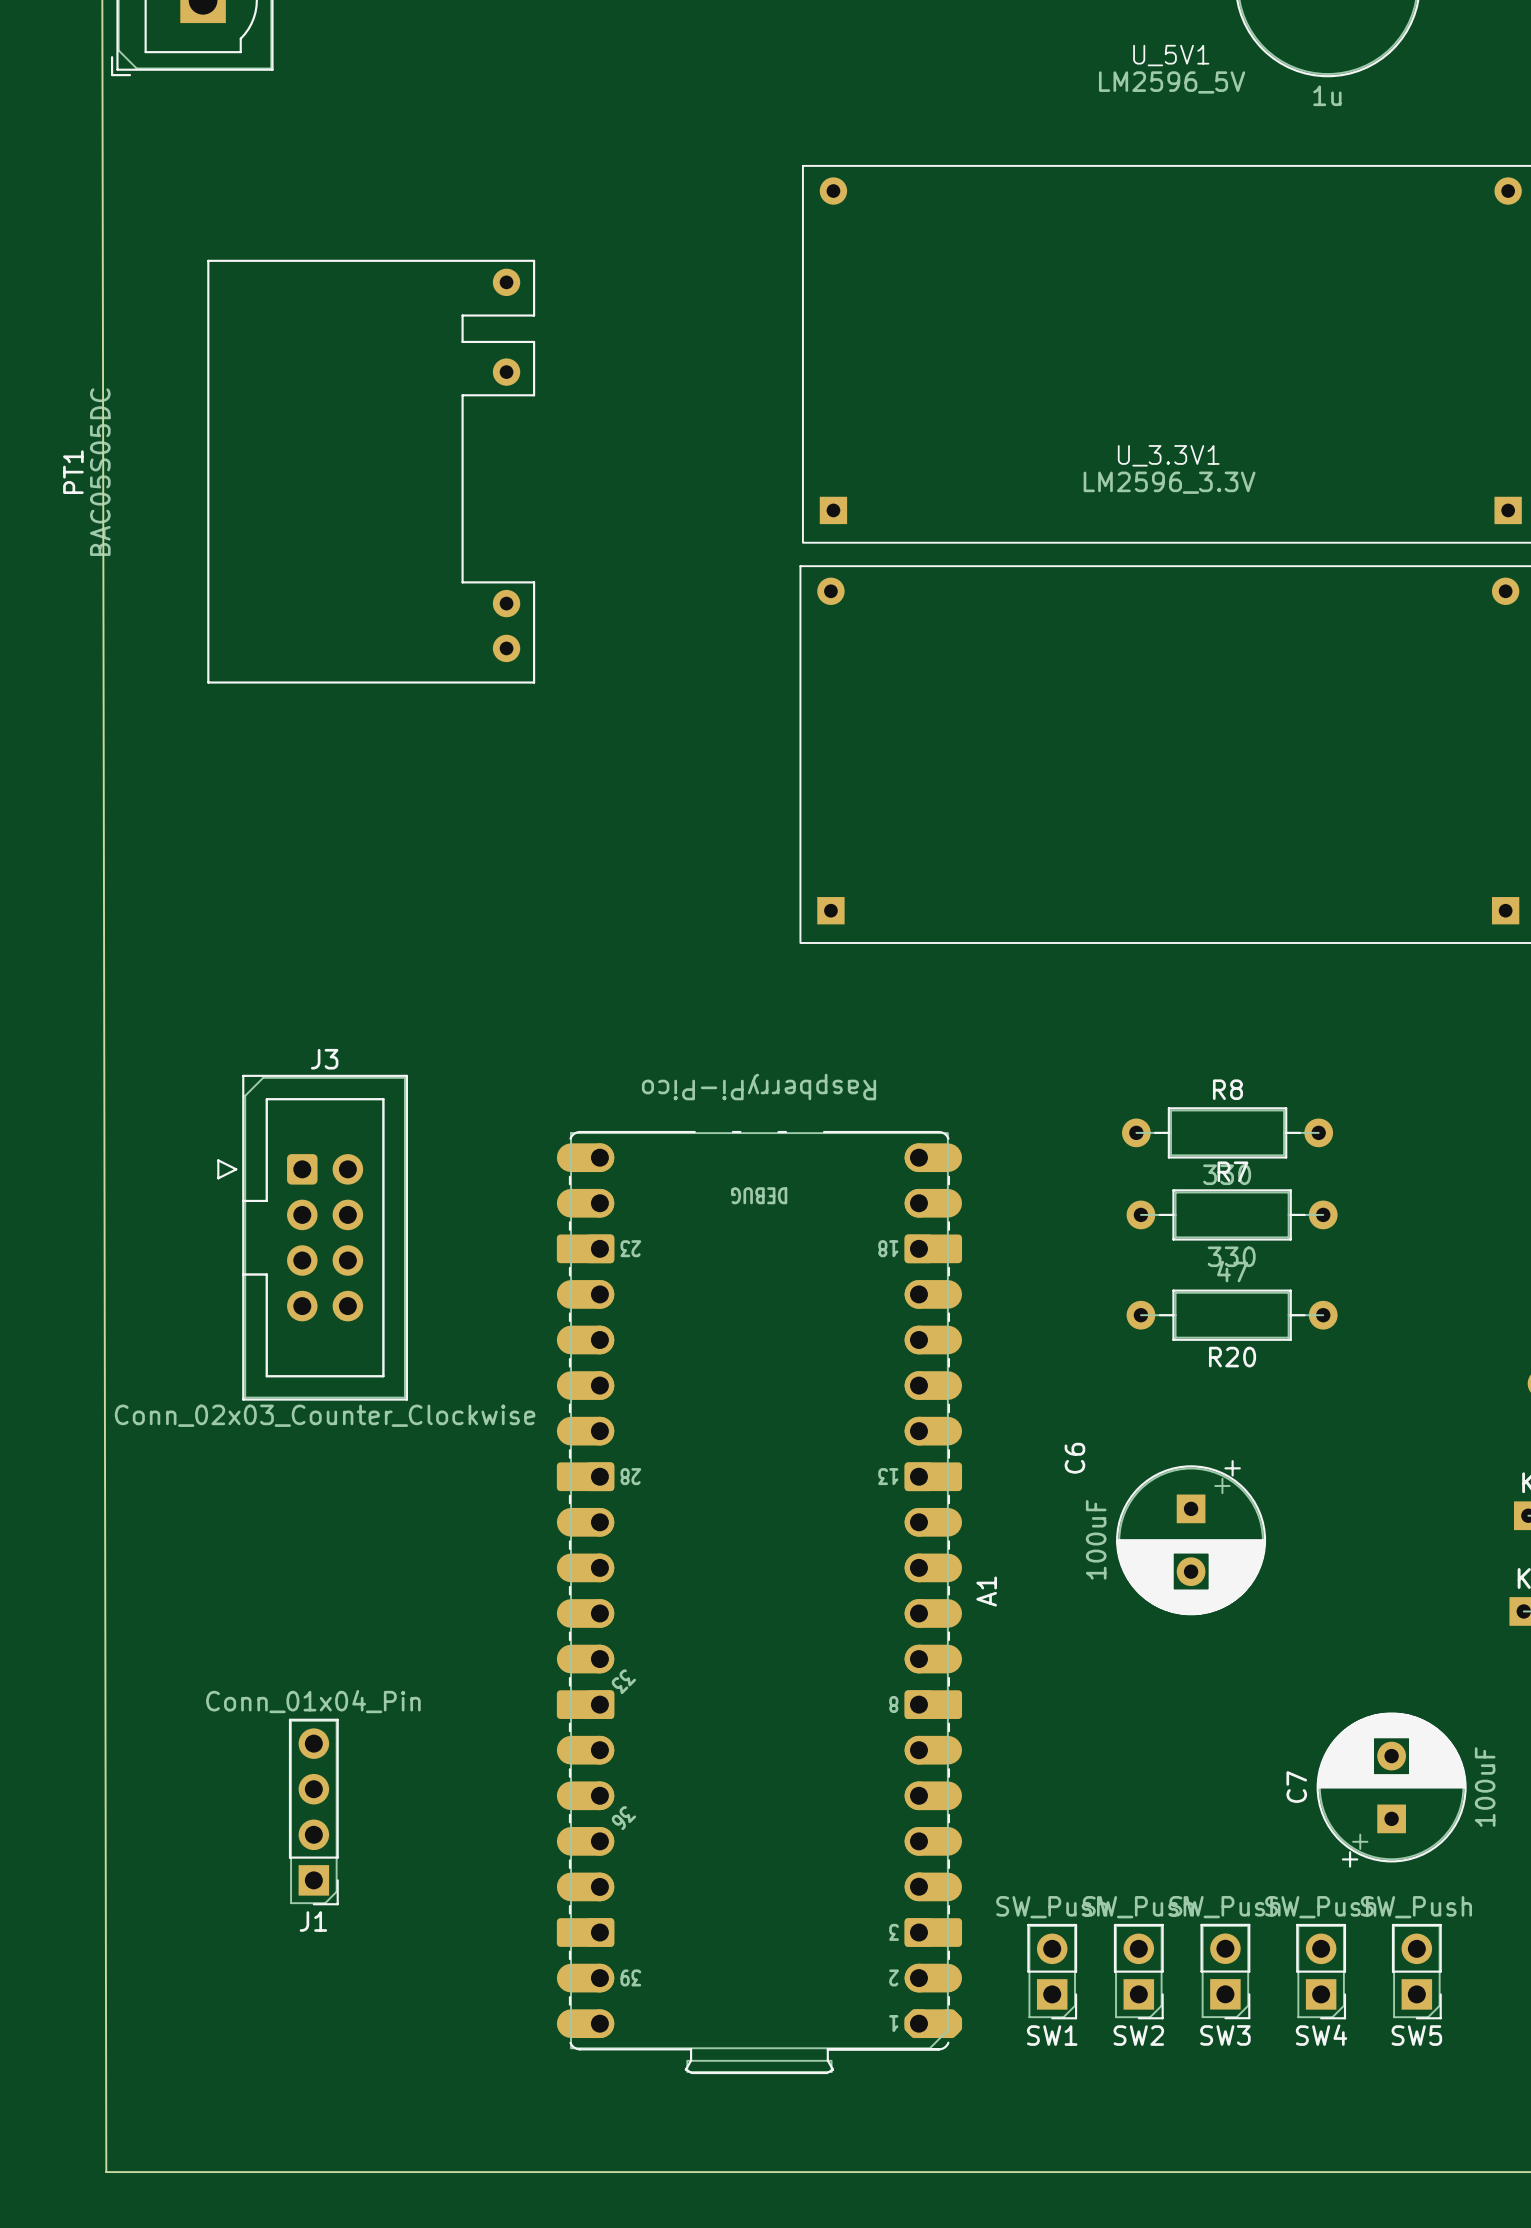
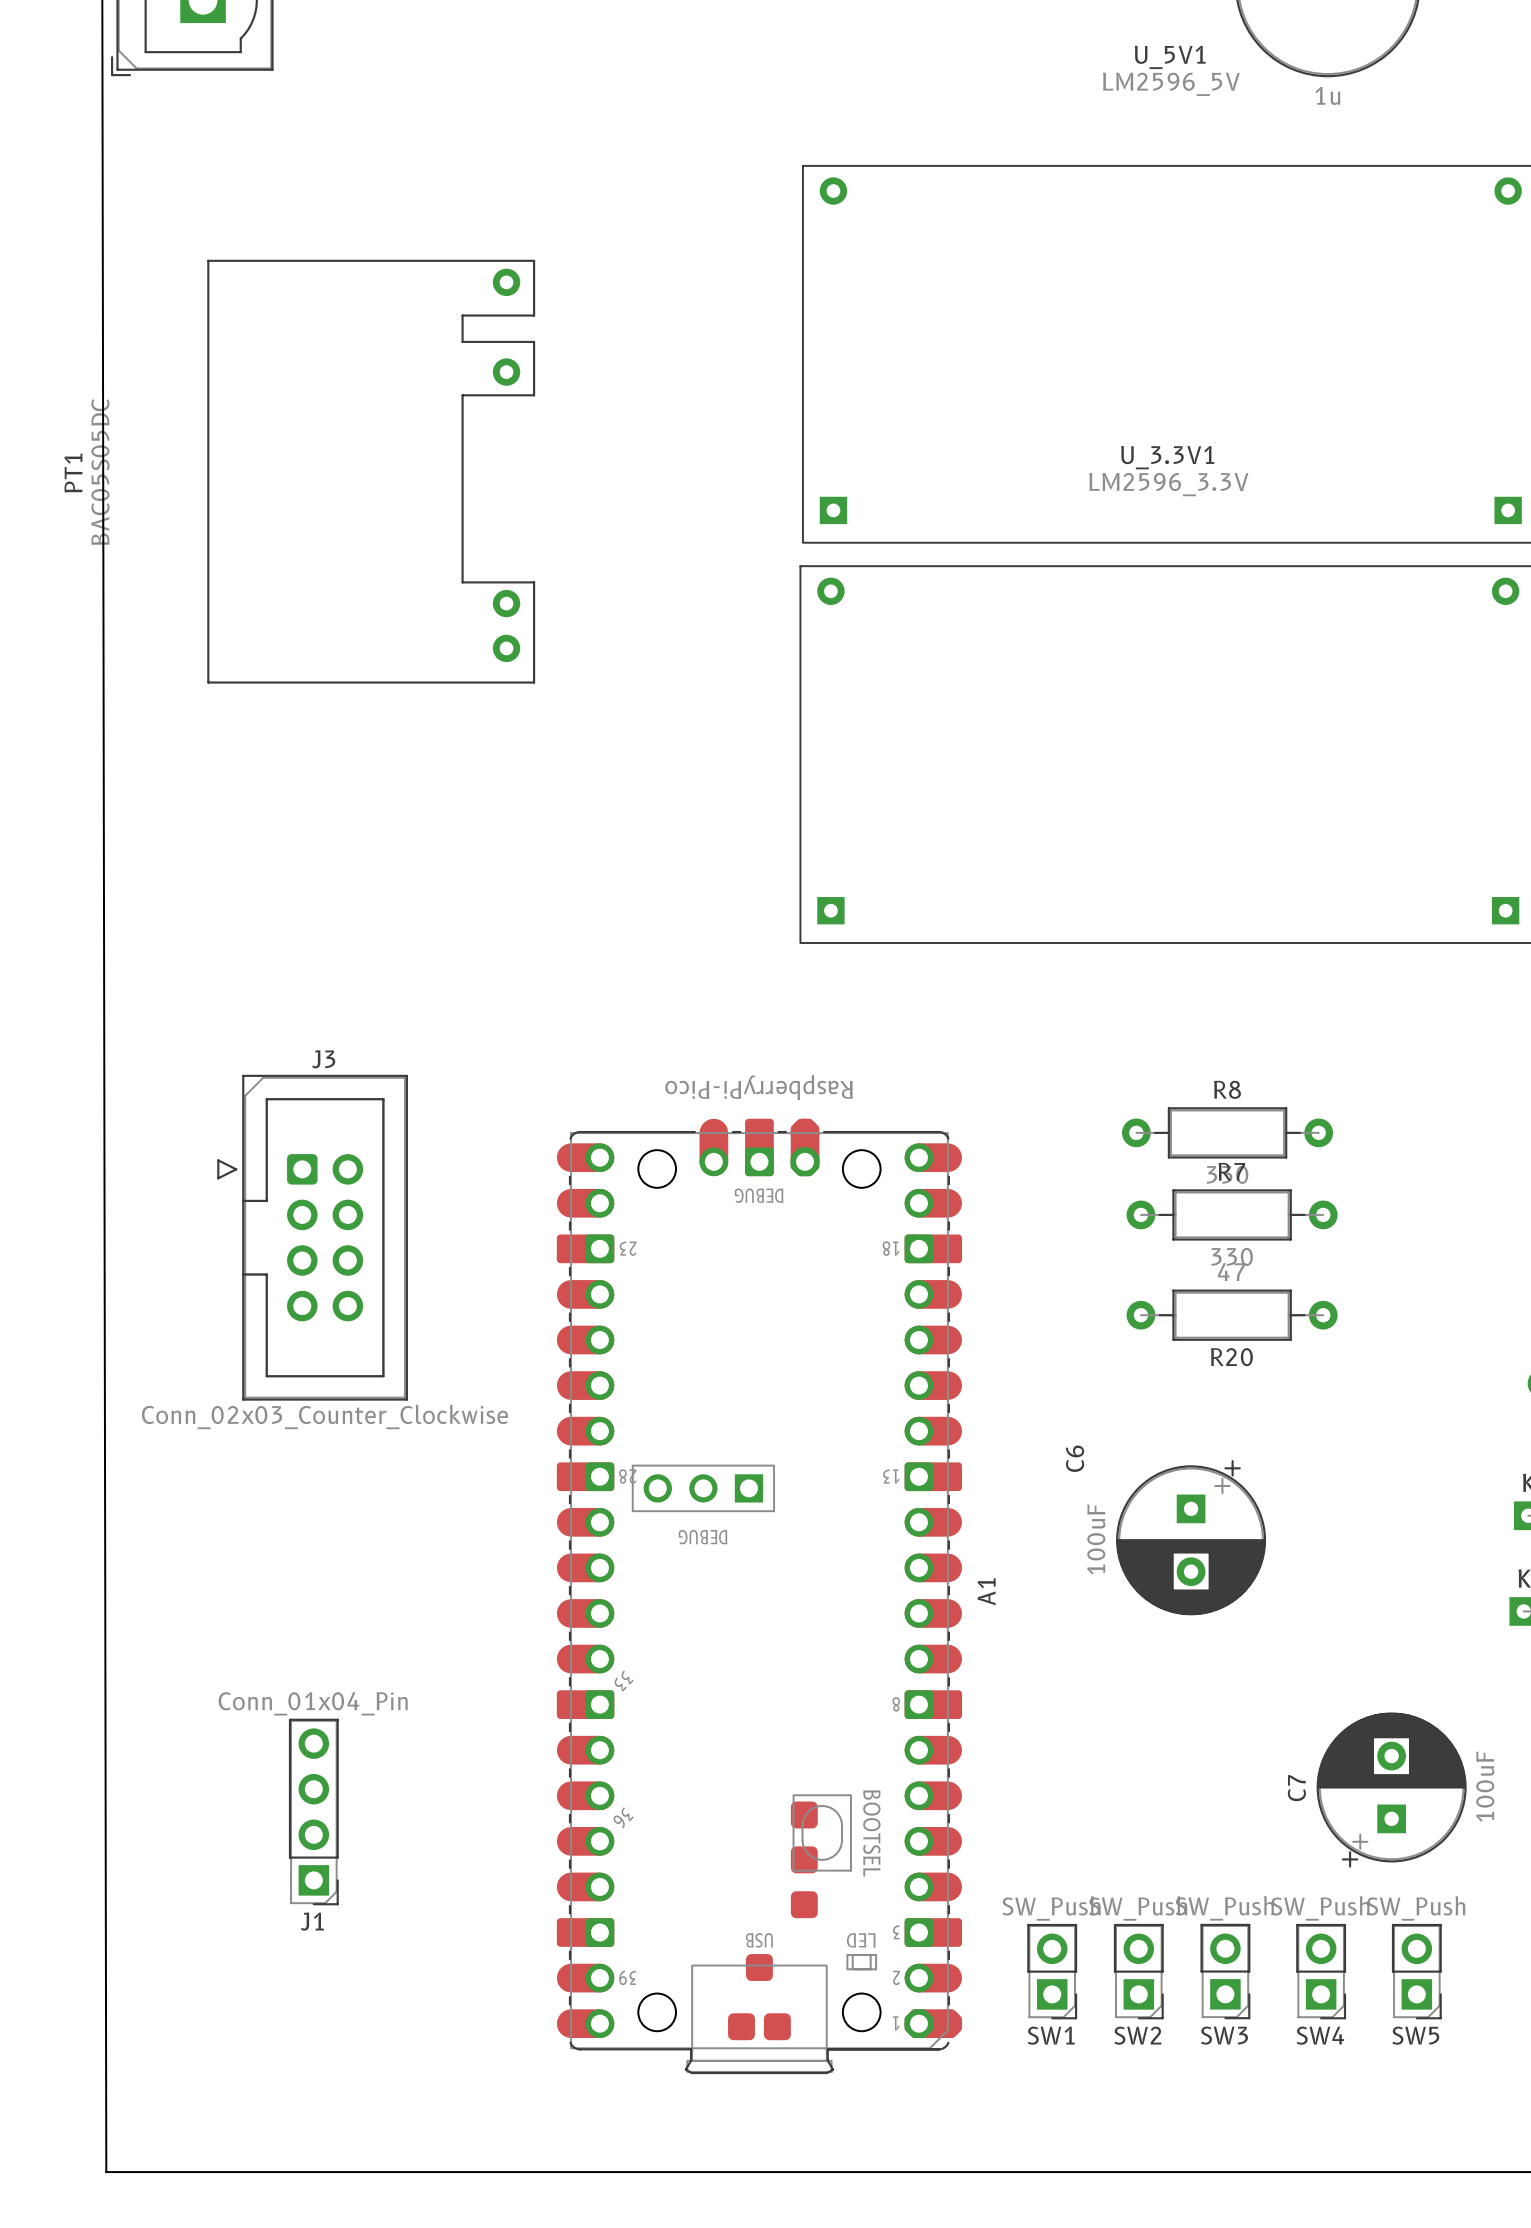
A1 footprint: [556, 1130, 963, 2075] -> [556, 1118, 963, 2075]

